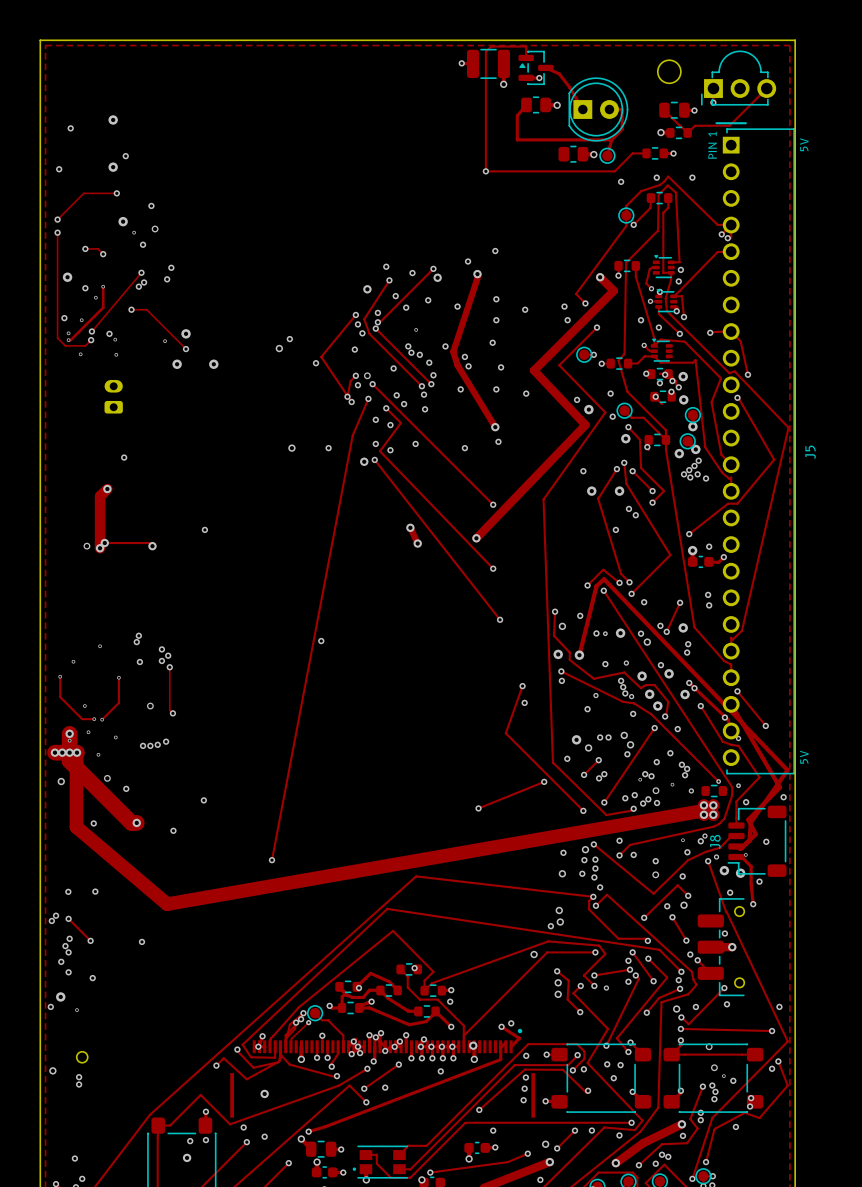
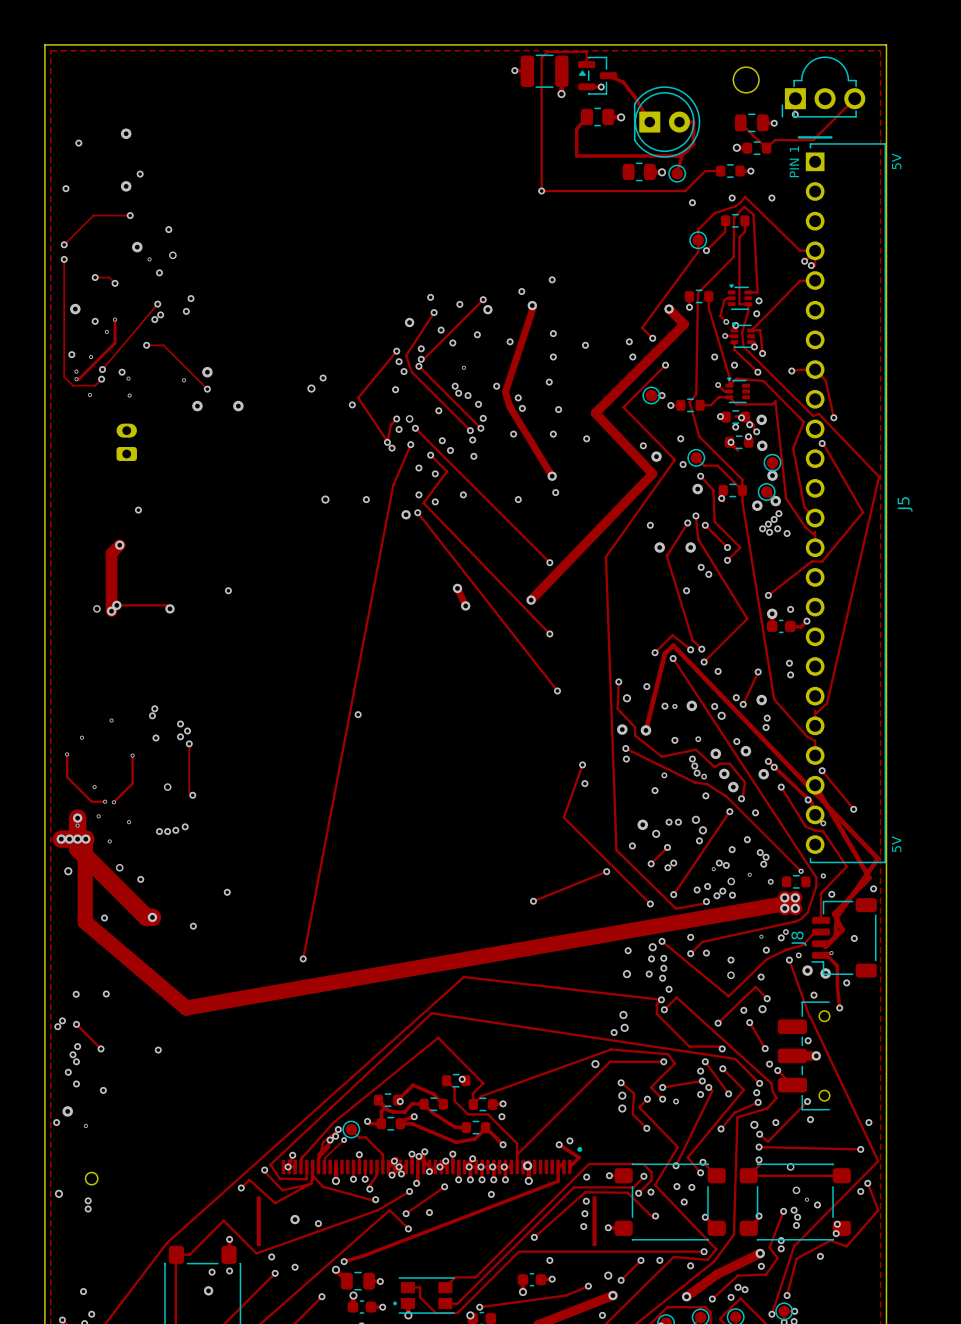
via: none -> (318, 1223)

